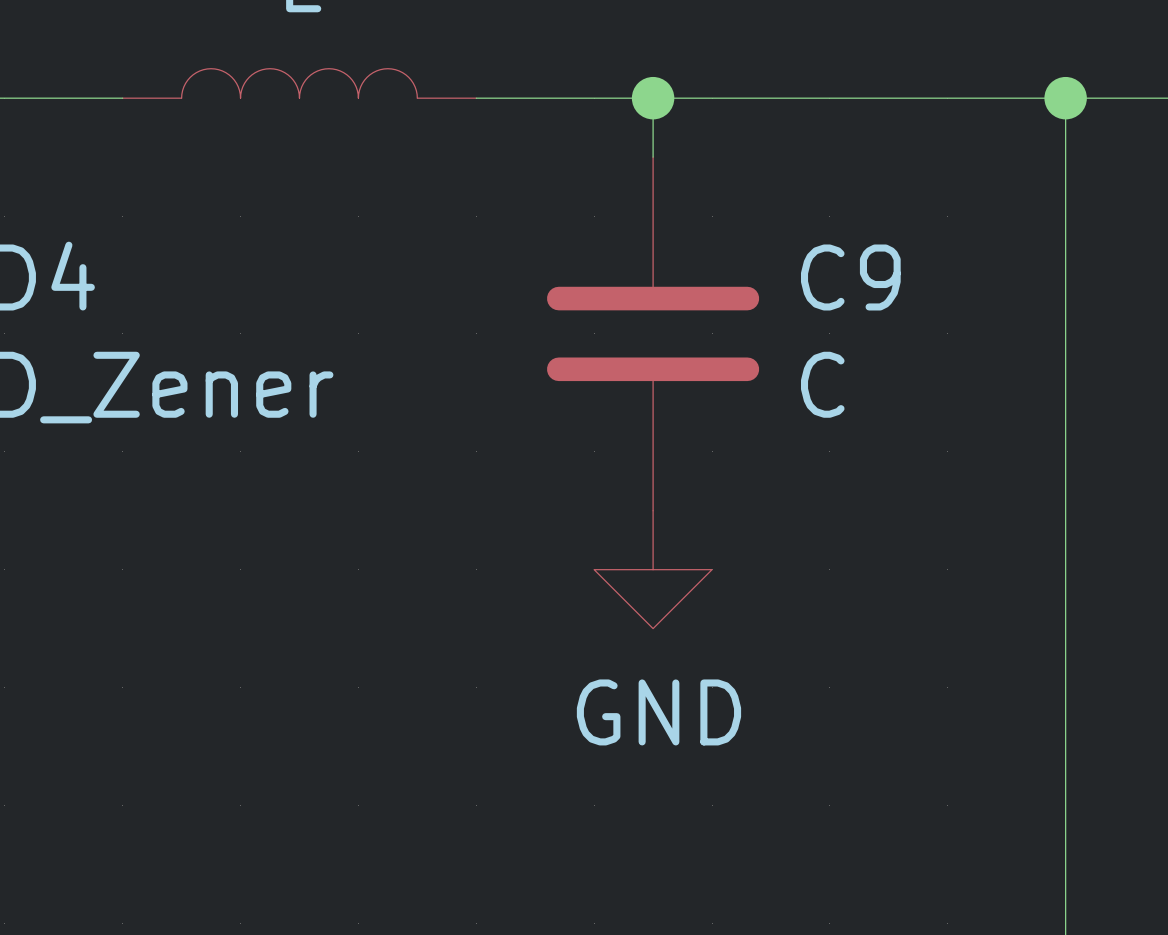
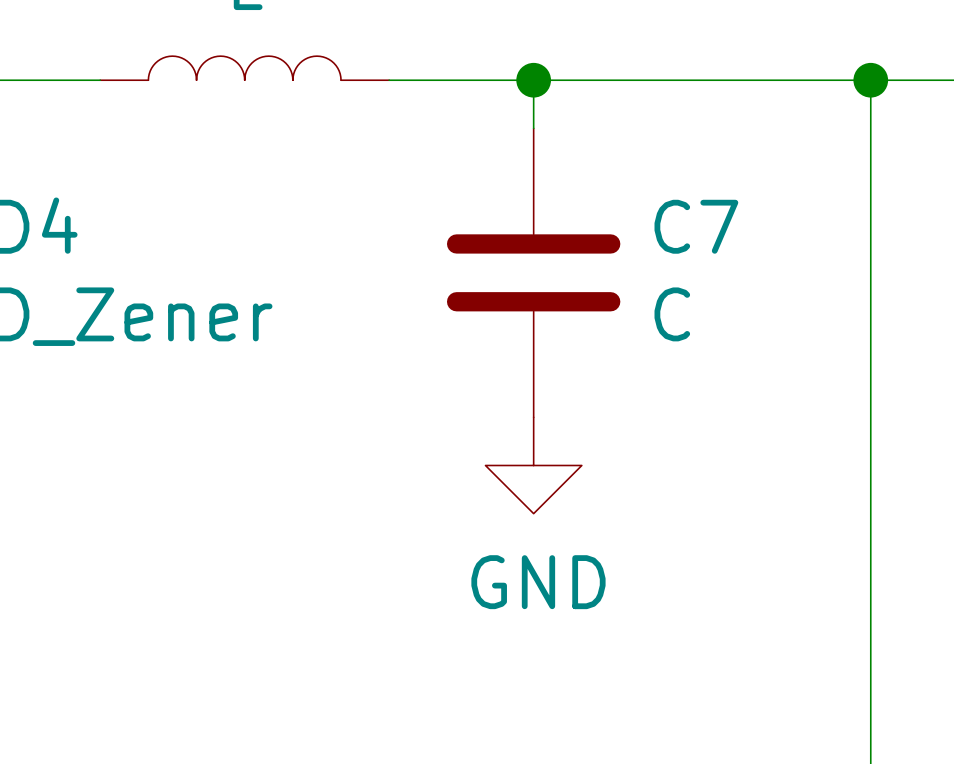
C9 name: C9 (850, 277) -> C7 (696, 226)

